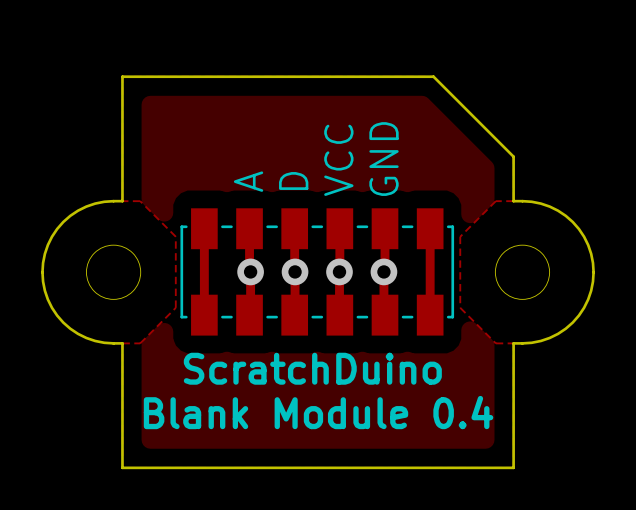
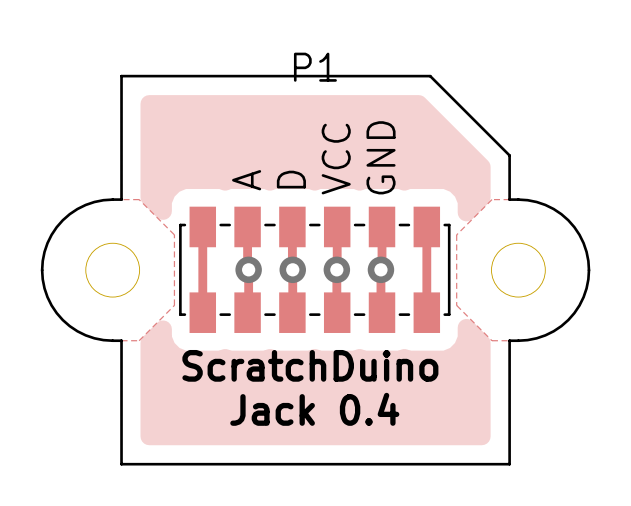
P1 name: none -> P1 (315, 67)
text: Blank Module 0.4 (318, 412) -> Jack 0.4 (314, 409)

